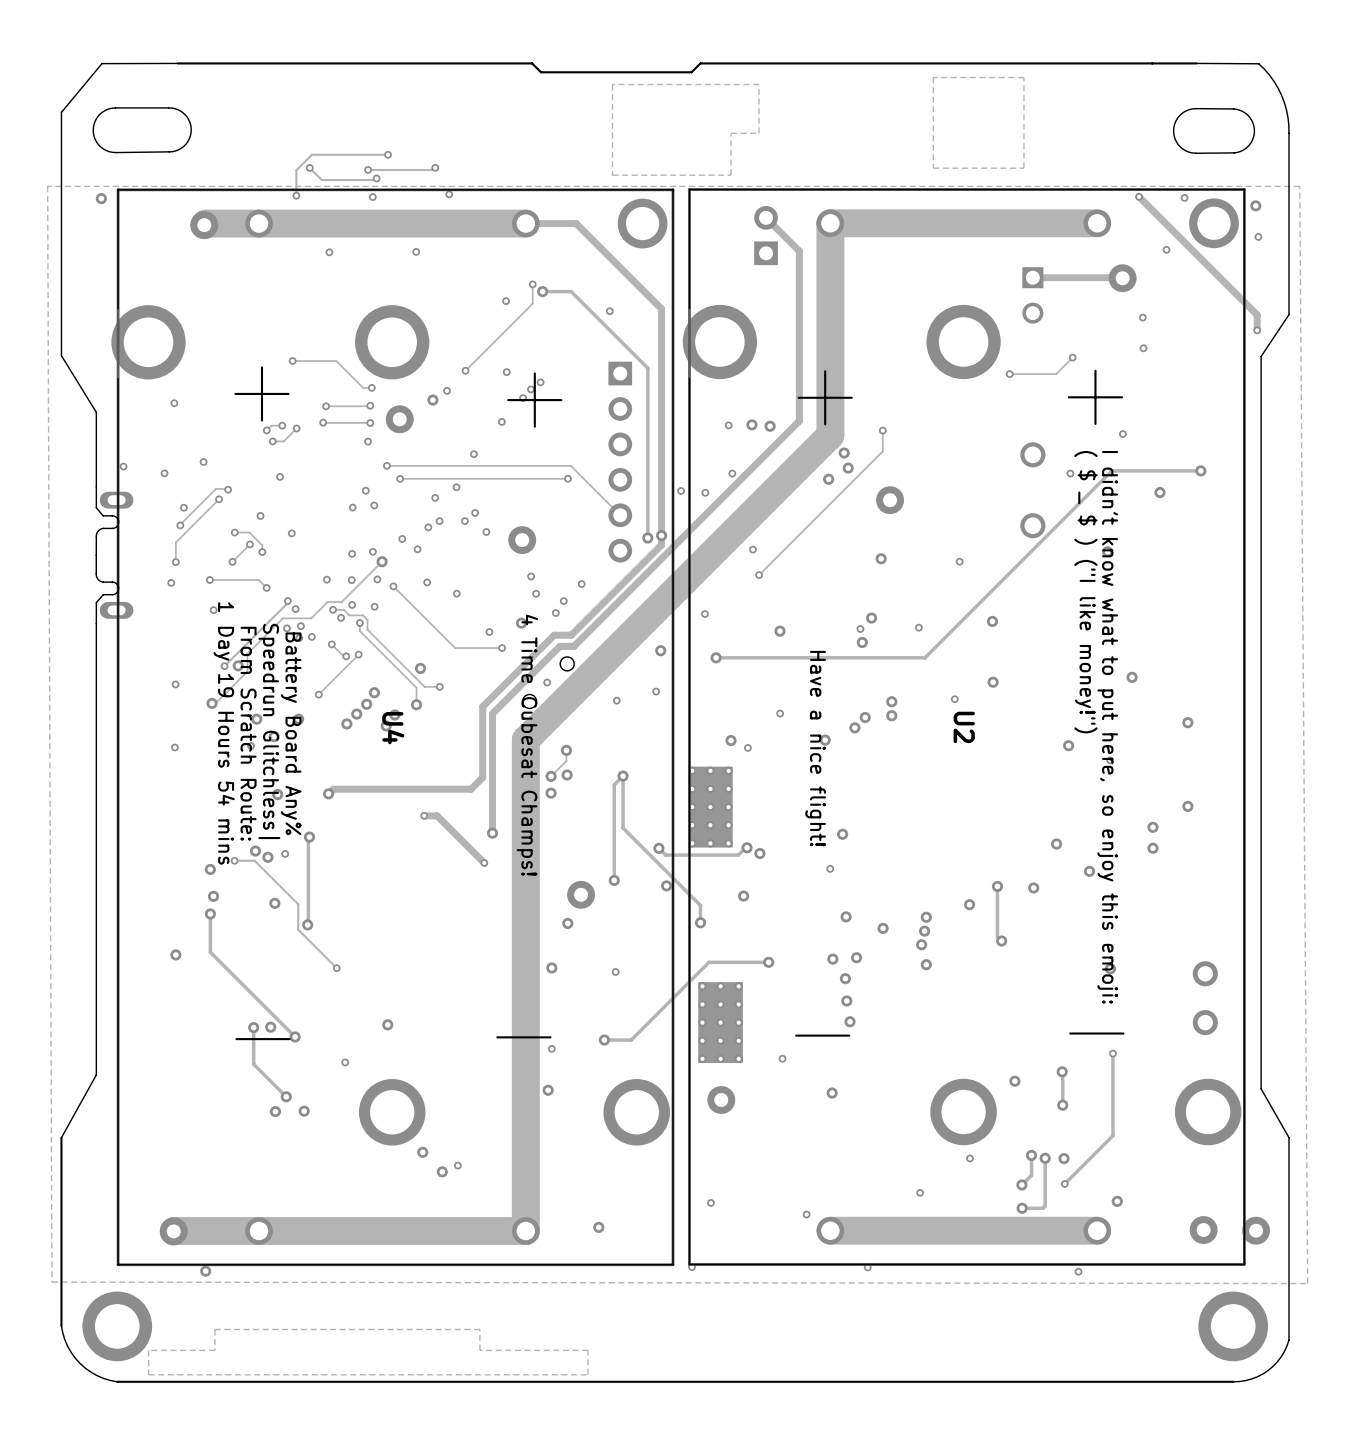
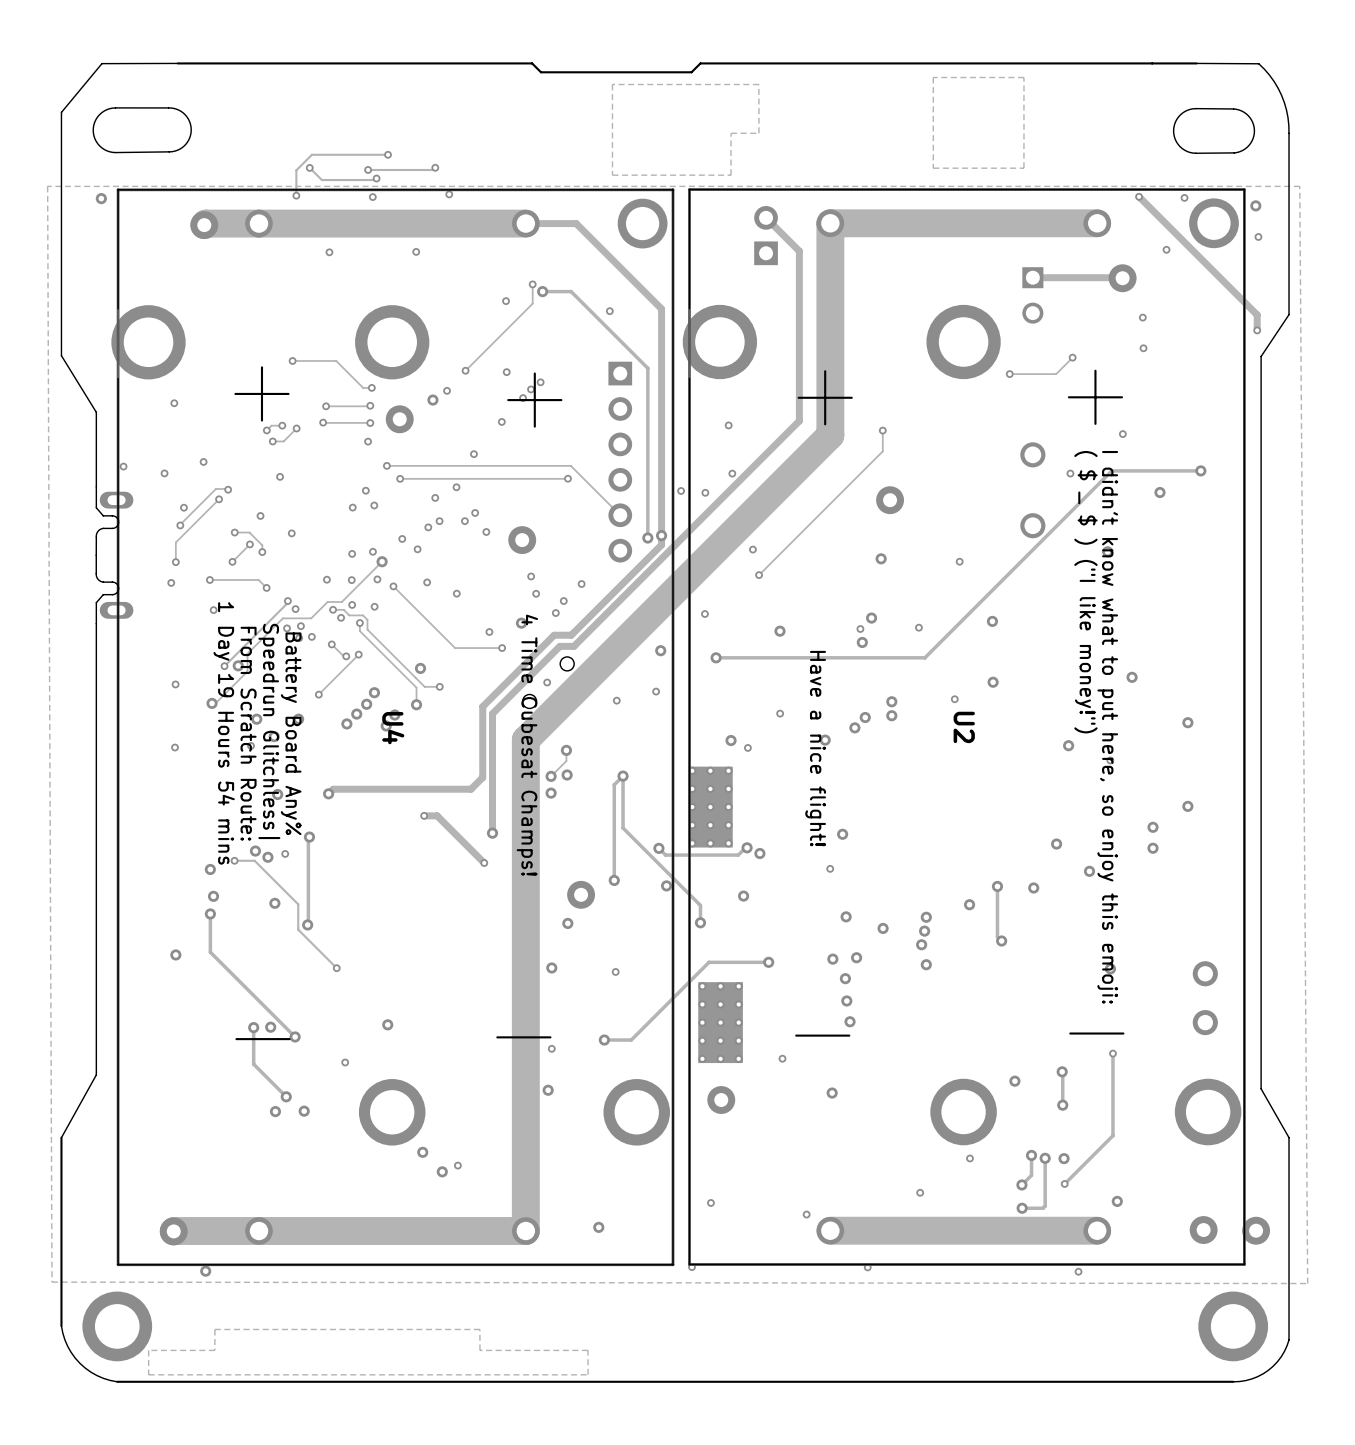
via: (751, 424) -> none
via: (770, 426) -> none
via: (844, 453) -> none
via: (848, 468) -> none
via: (828, 479) -> none

